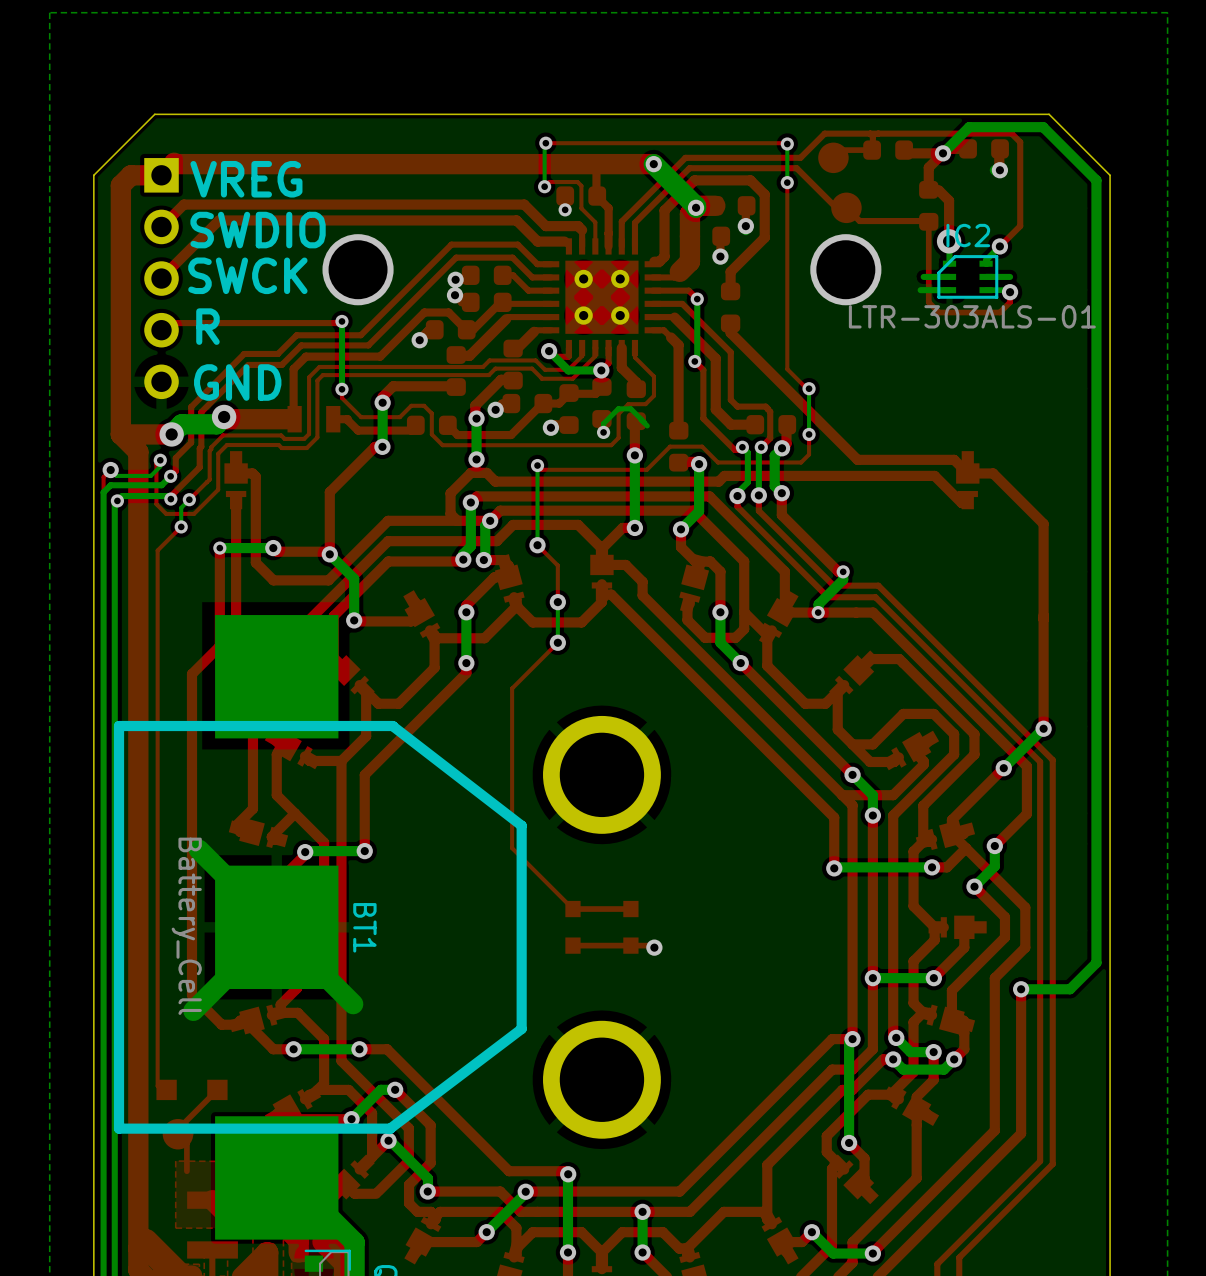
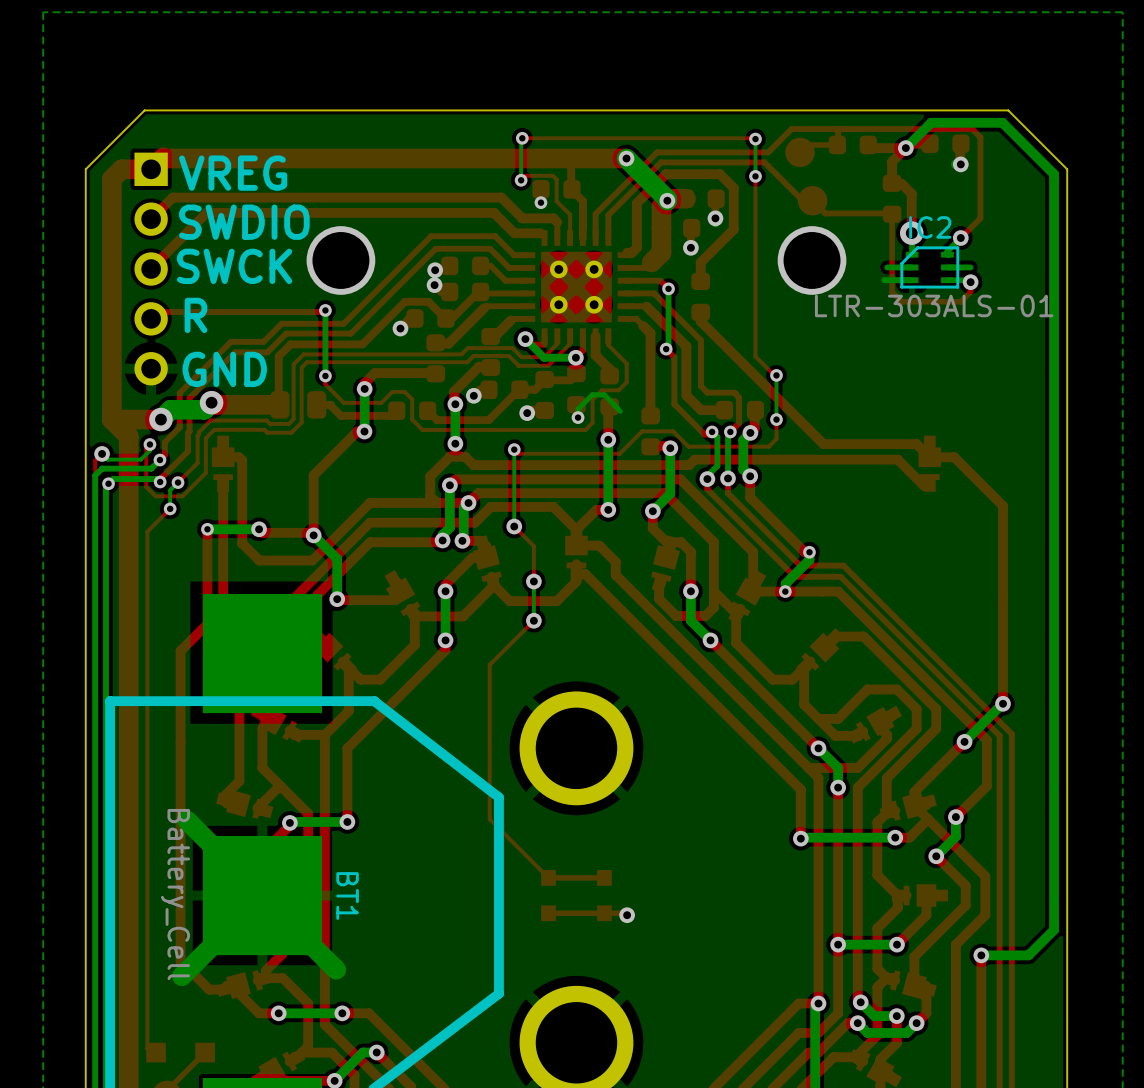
part footprint: [287, 405, 341, 433] -> [270, 391, 327, 419]

